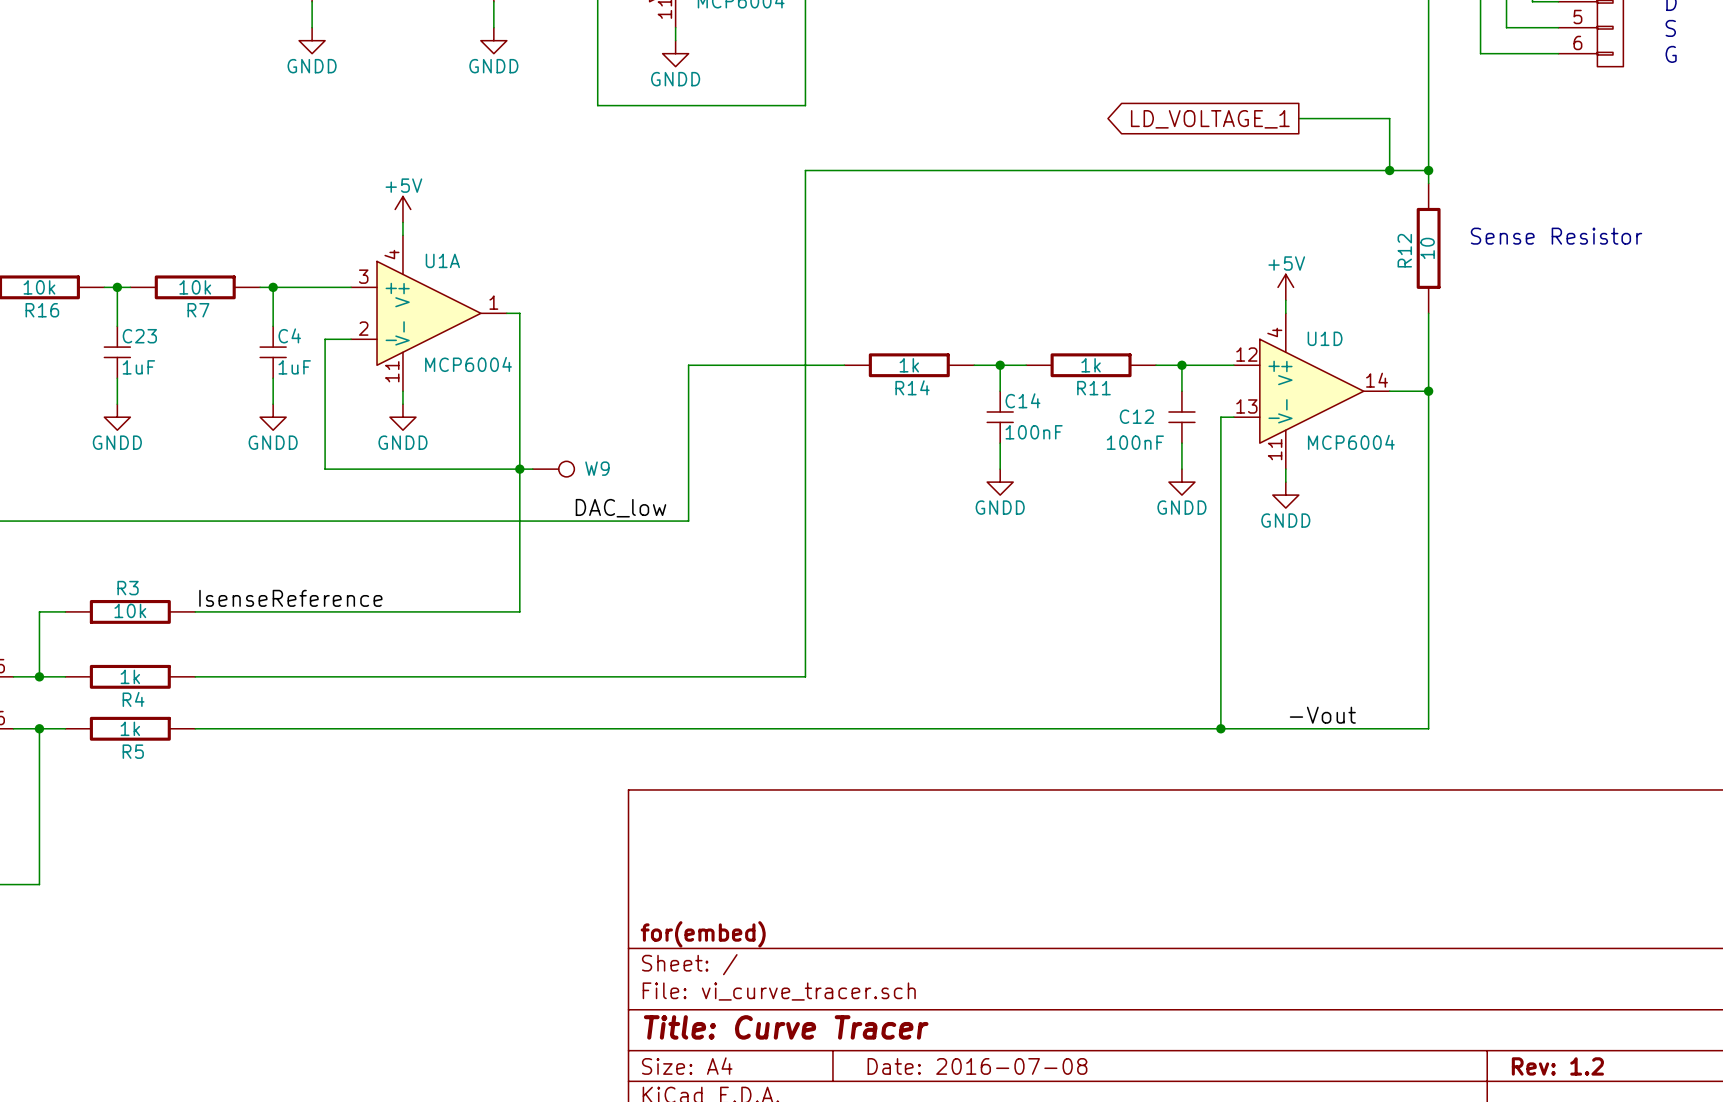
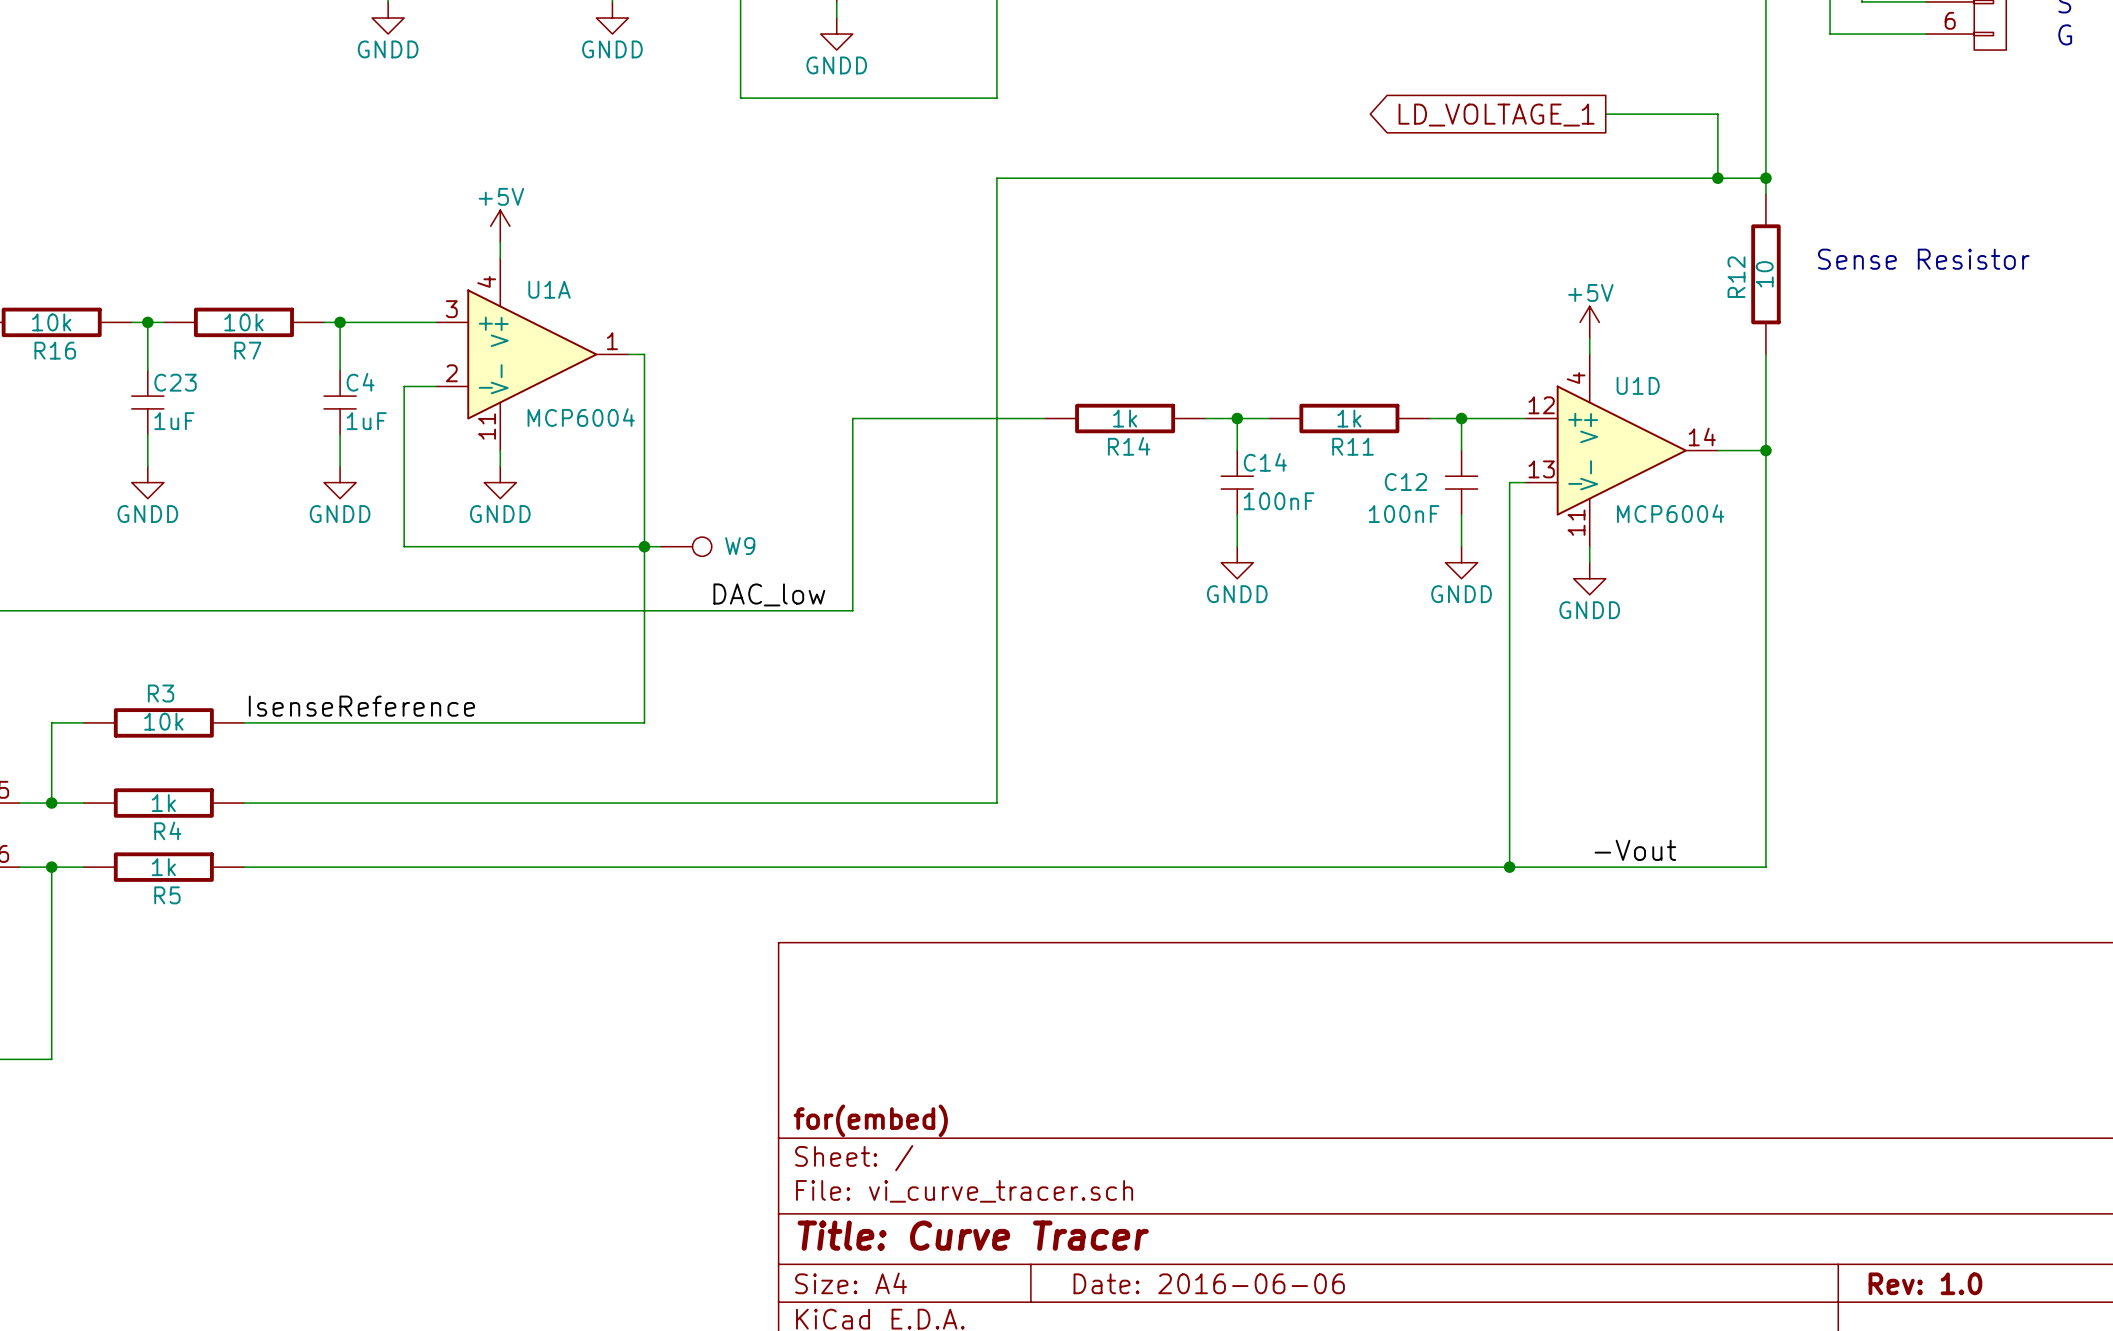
title block: Date: 2016-07-08 (977, 1066) -> Date: 2016-06-06 (1209, 1283)
title block: Rev: 1.2 (1557, 1066) -> Rev: 1.0 (1925, 1283)

